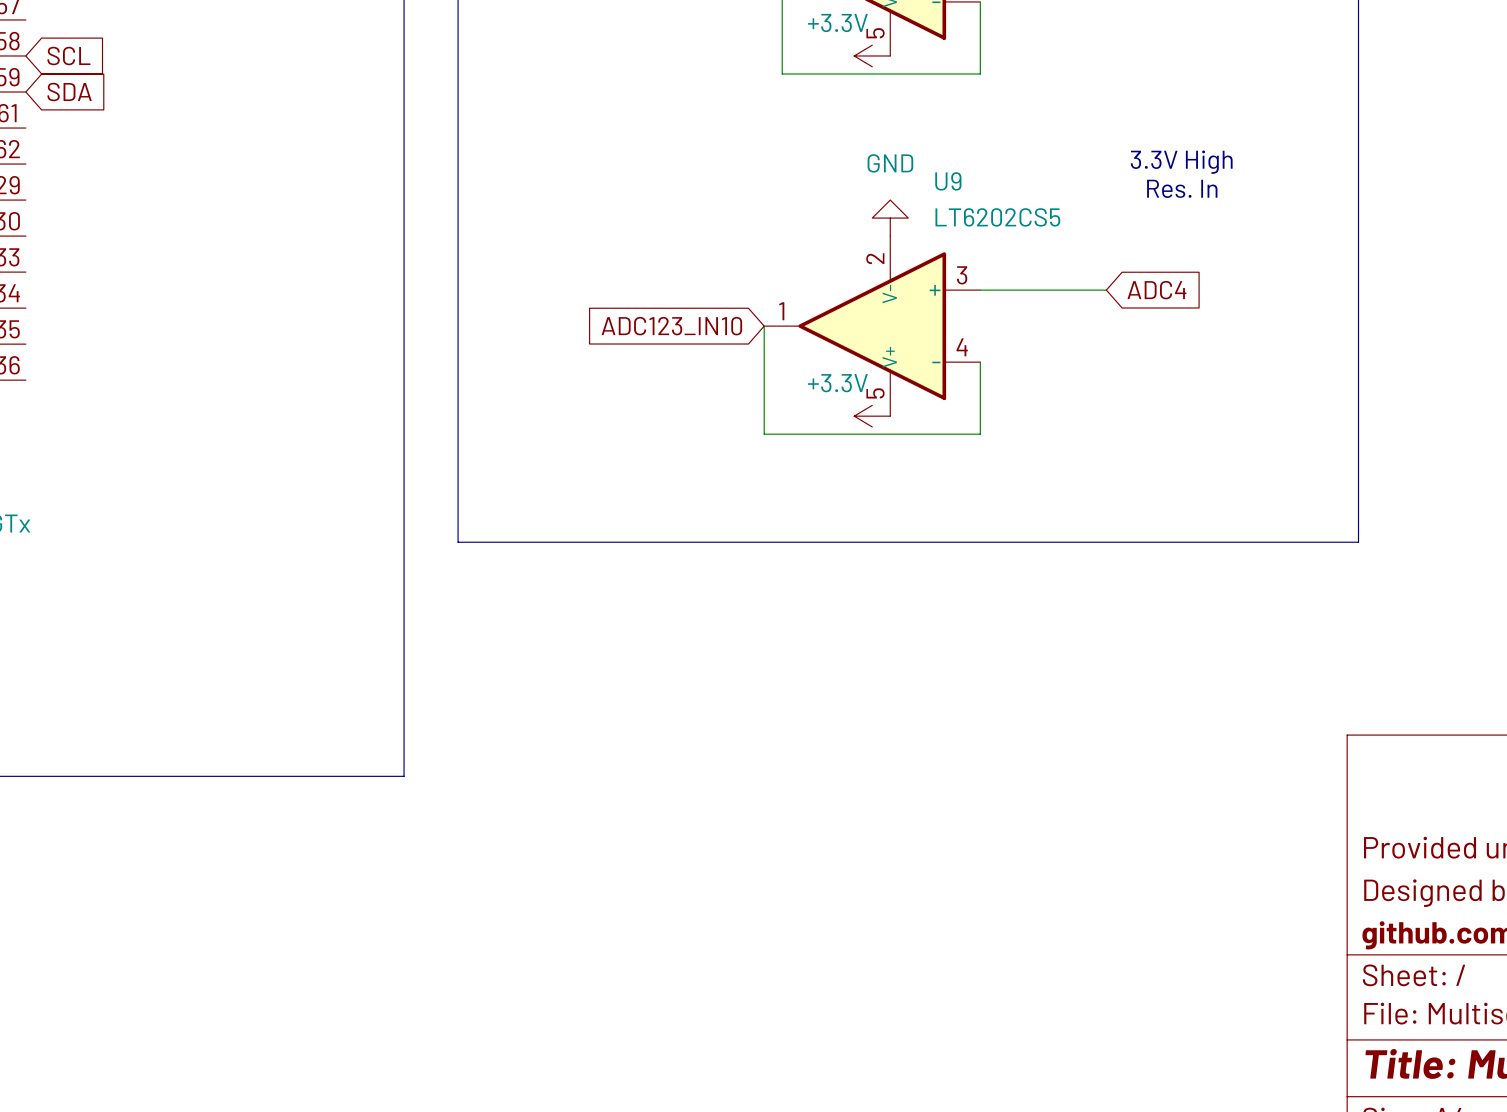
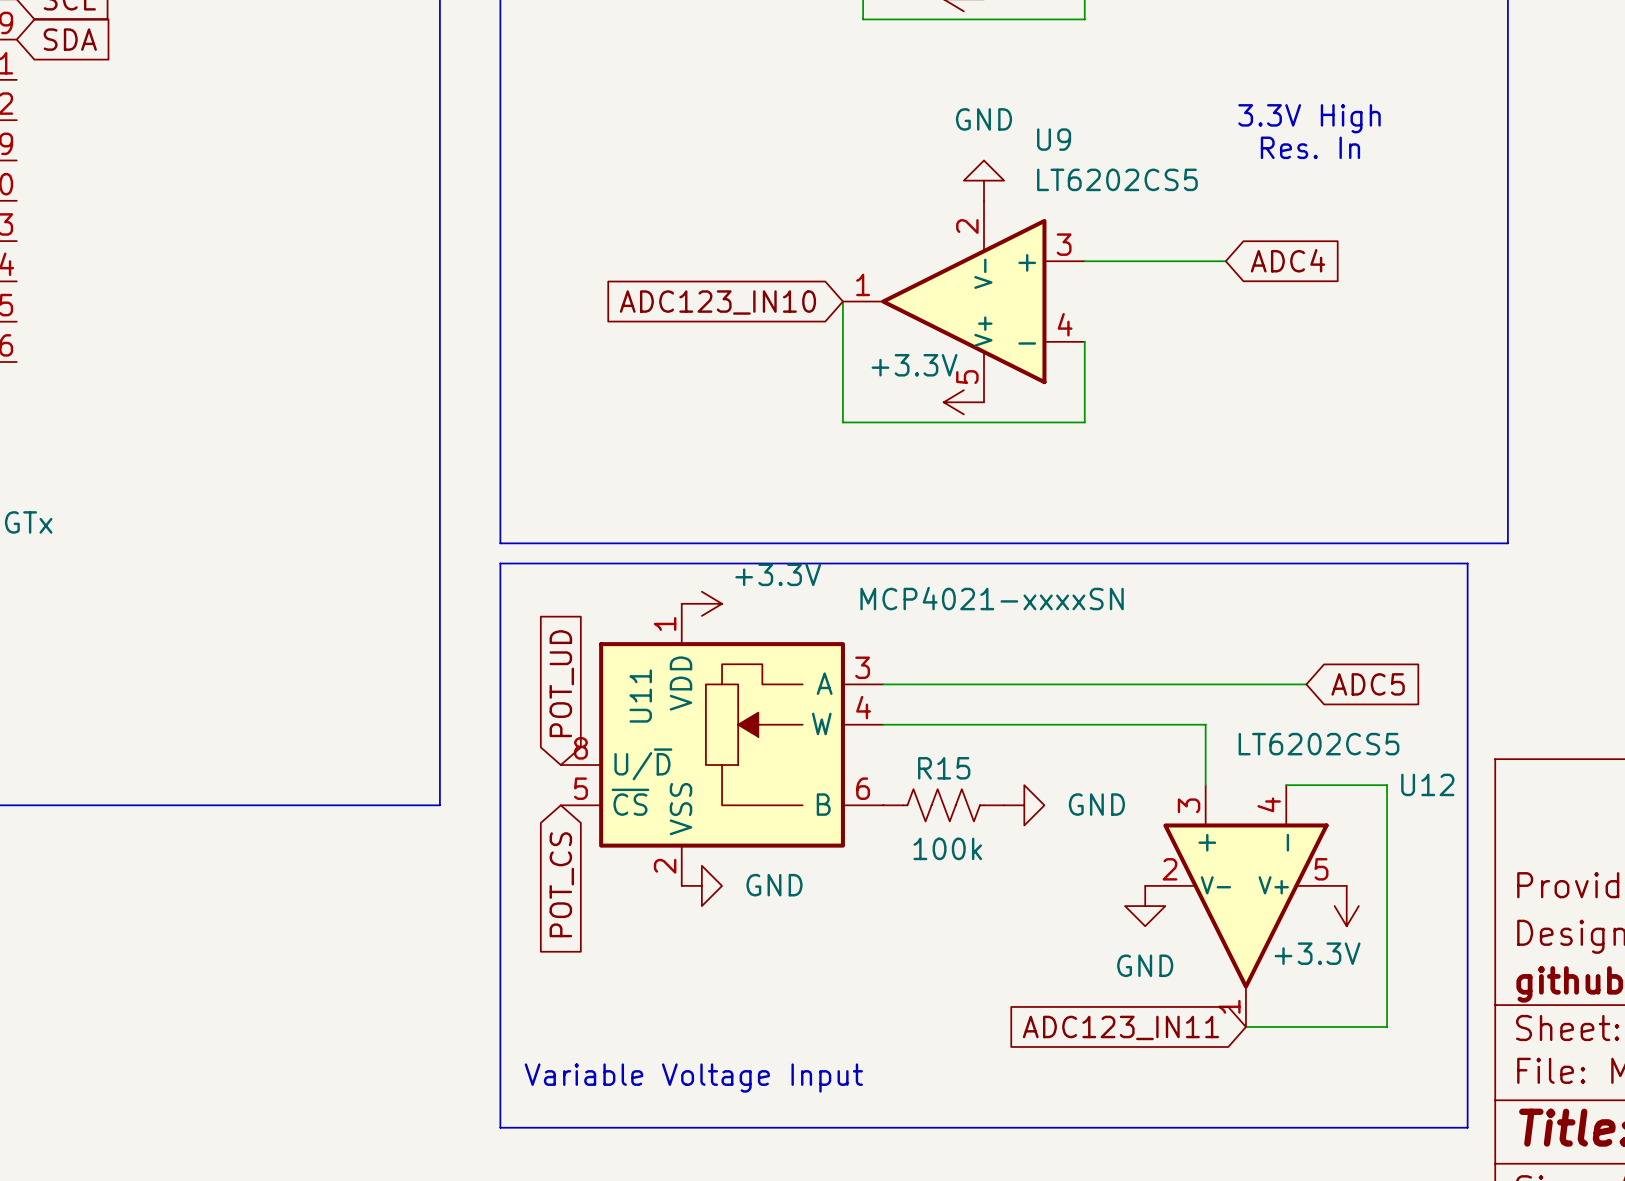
line: none -> (500, 563) (1467, 563) (1467, 1127) (500, 1127) (500, 563)
power symbol: none -> +3.3V (701, 603)
wire: none -> (883, 684) (1306, 684)
global label: none -> ADC5 (1368, 684)
global label: none -> POT_UD (561, 683)
wire: none -> (883, 724) (1205, 724) (1205, 785)
U11: none -> MCP4021-xxxxSN (722, 744)
wire: none -> (1286, 785) (1387, 785) (1387, 1026) (1245, 1026)
R15: none -> 100k (943, 805)
power symbol: none -> GND (1024, 805)
global label: none -> POT_CS (561, 884)
power symbol: none -> GND (701, 885)
power symbol: none -> GND (1145, 906)
U12: none -> LT6202CS5 (1245, 906)
power symbol: none -> +3.3V (1346, 906)
global label: none -> ADC123_IN11 (1120, 1027)
text: none -> Variable Voltage Input (693, 1078)

